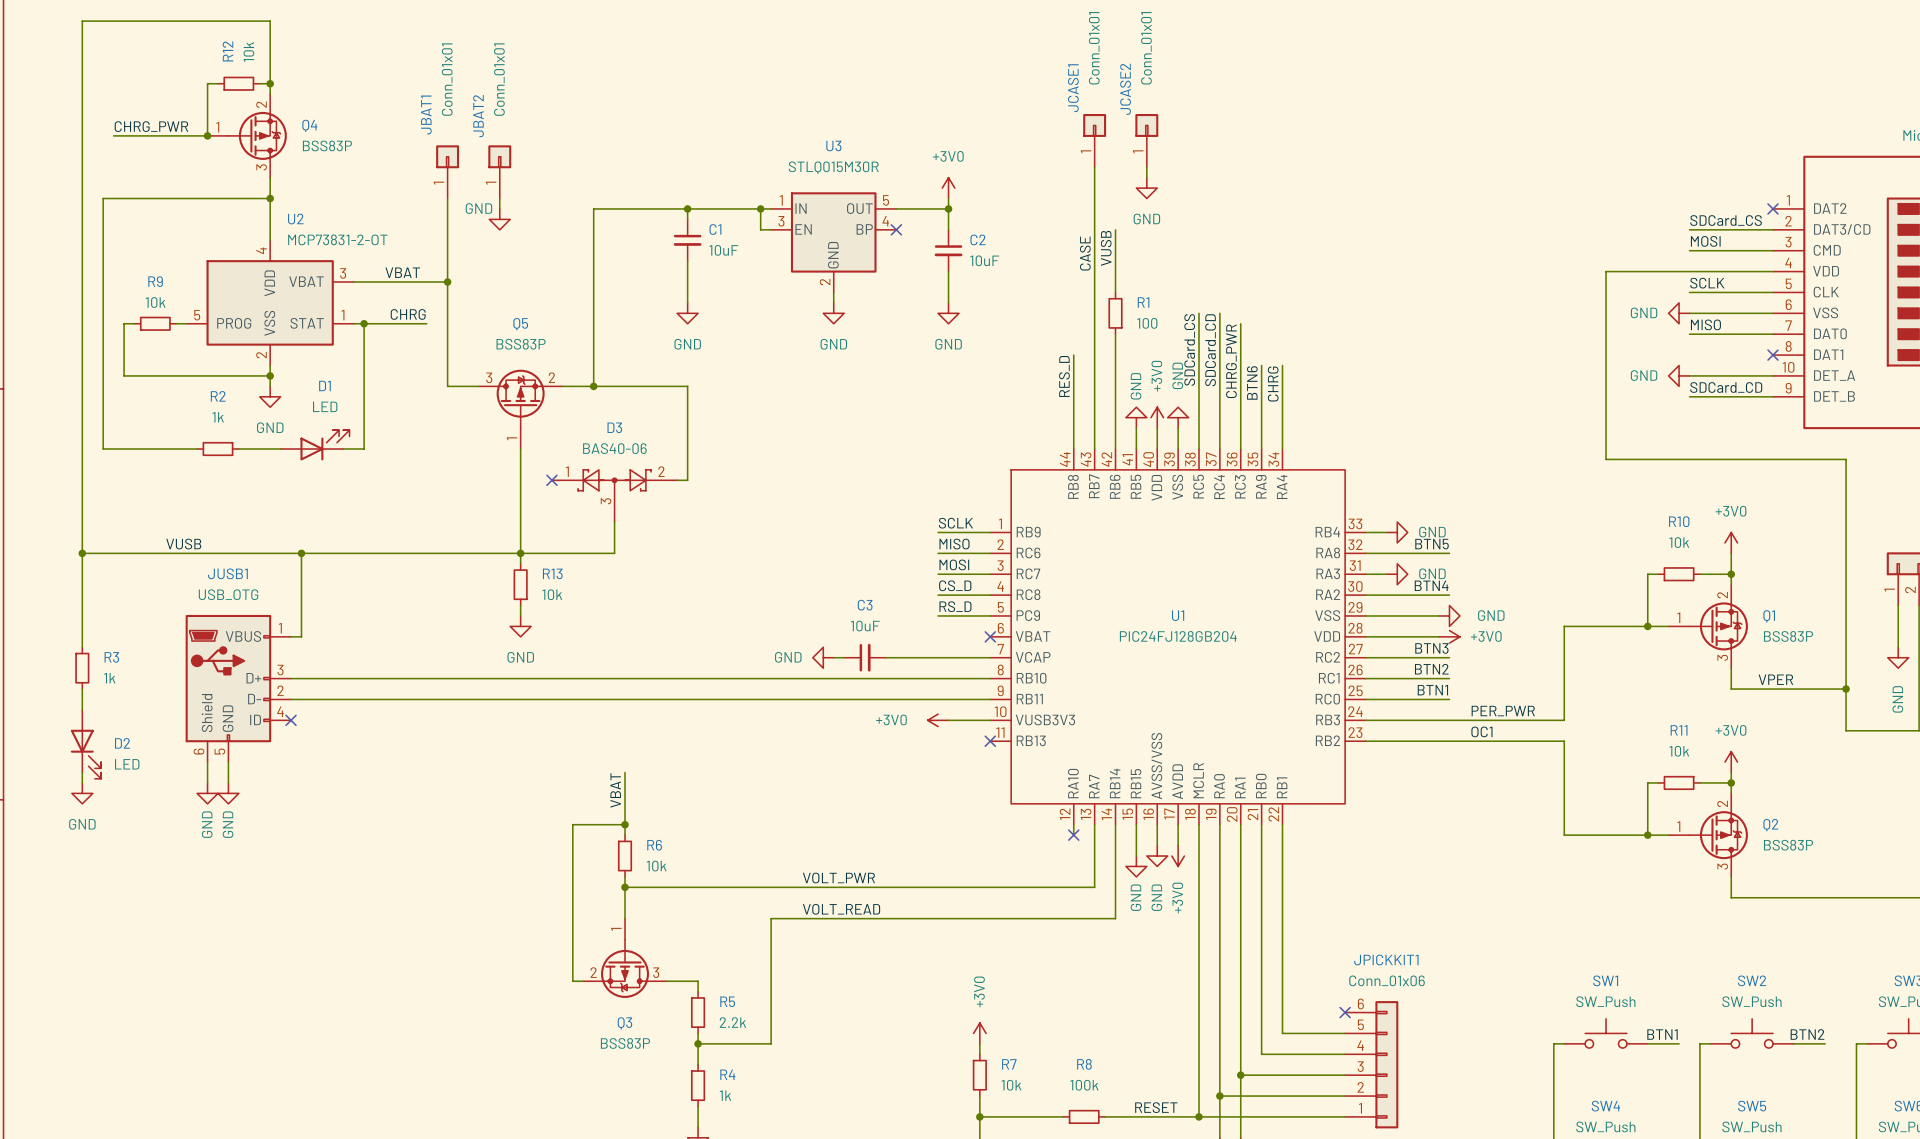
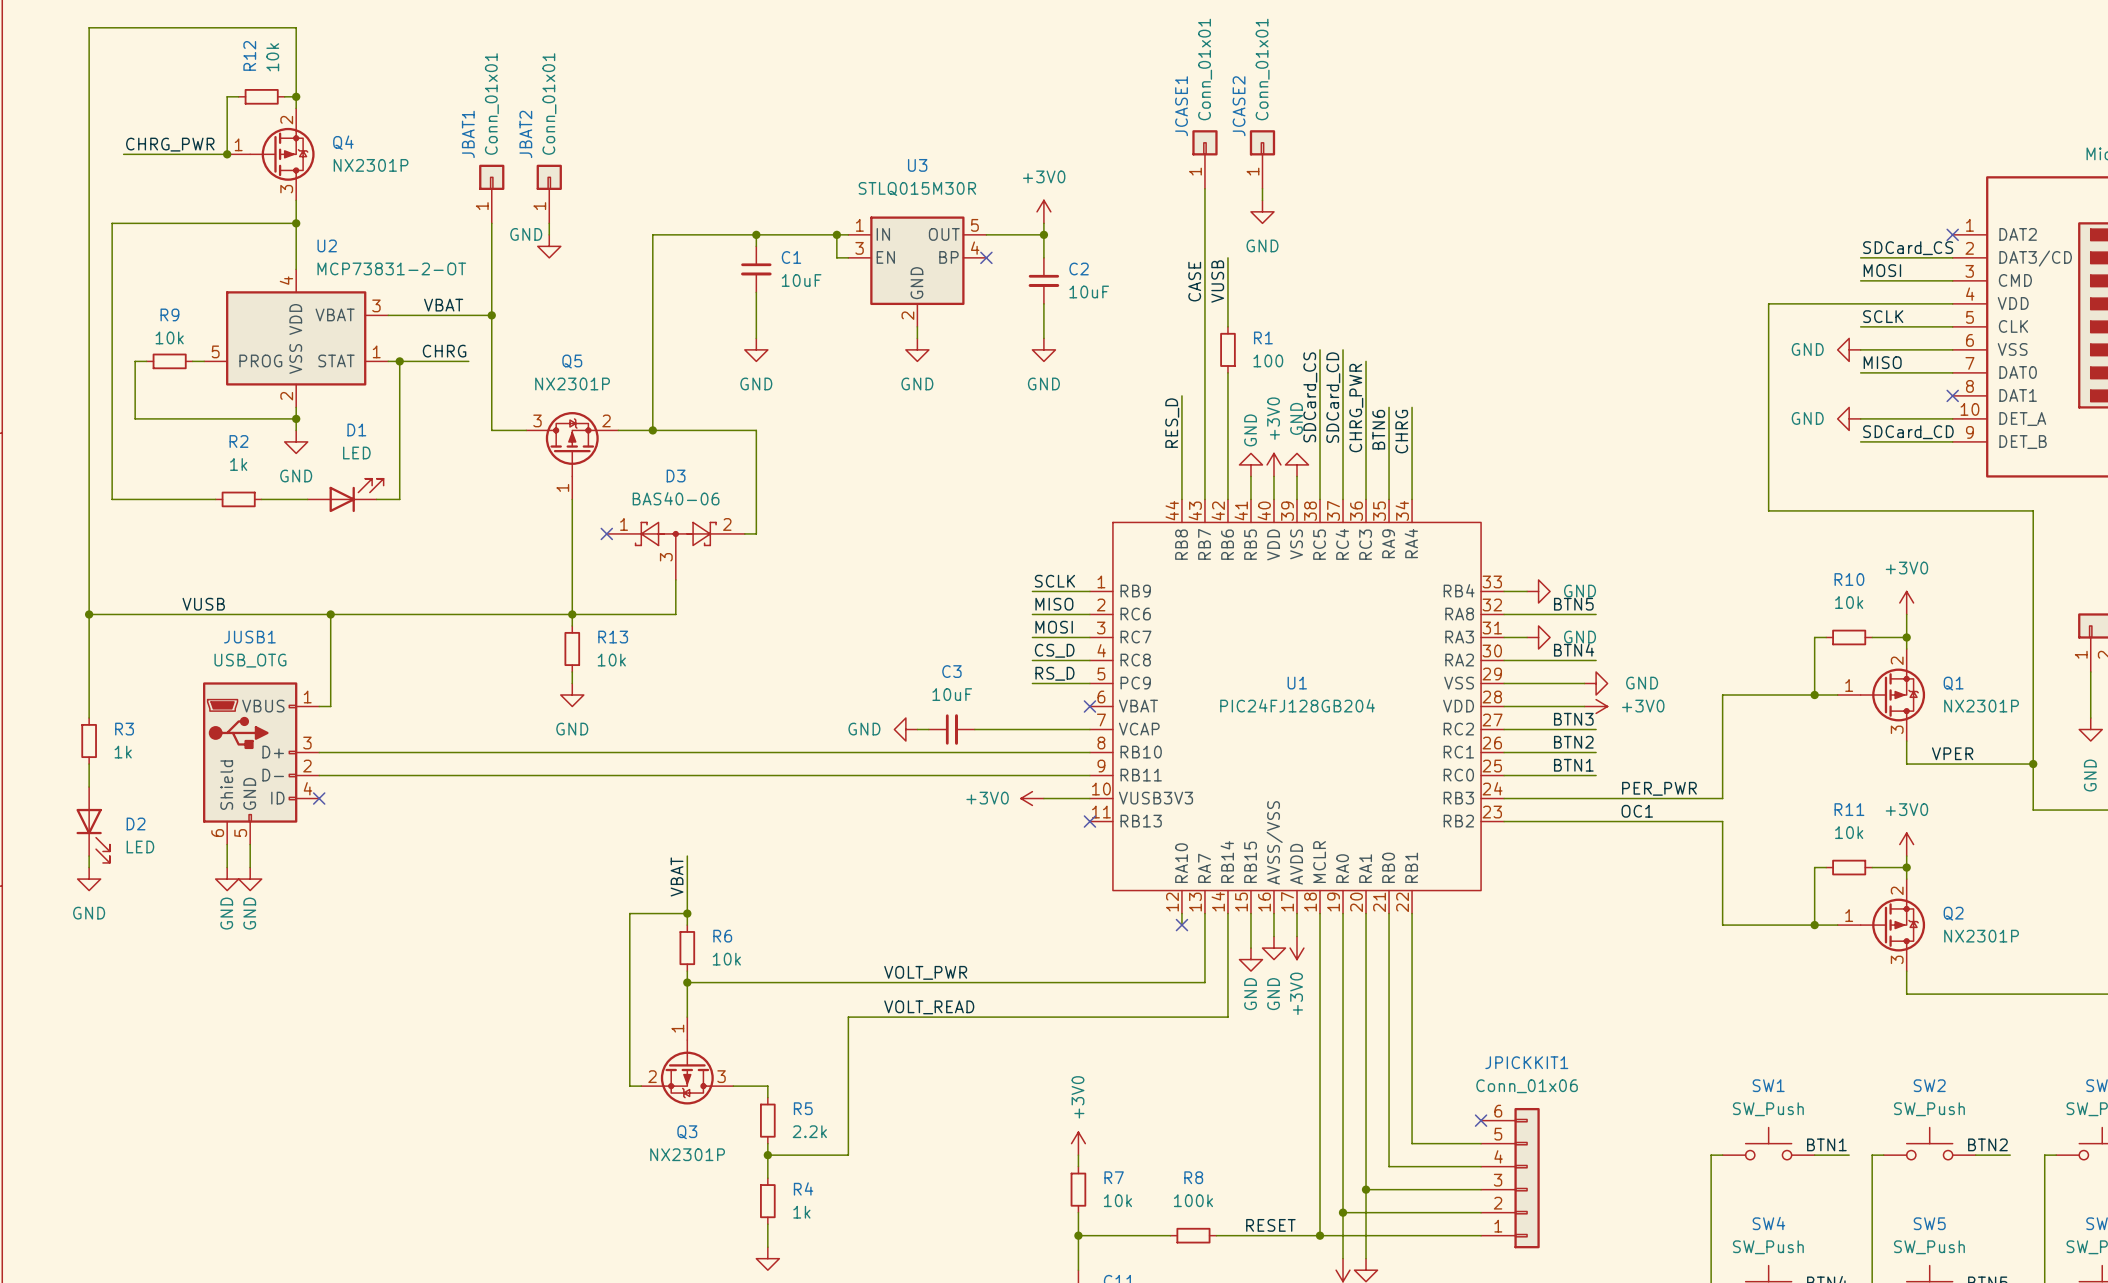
Q4 value: BSS83P (327, 145) -> NX2301P (371, 165)
Q5 value: BSS83P (521, 344) -> NX2301P (572, 383)
Q1 value: BSS83P (1788, 636) -> NX2301P (1981, 706)
Q2 value: BSS83P (1788, 845) -> NX2301P (1981, 936)
Q3 value: BSS83P (625, 1043) -> NX2301P (687, 1154)

